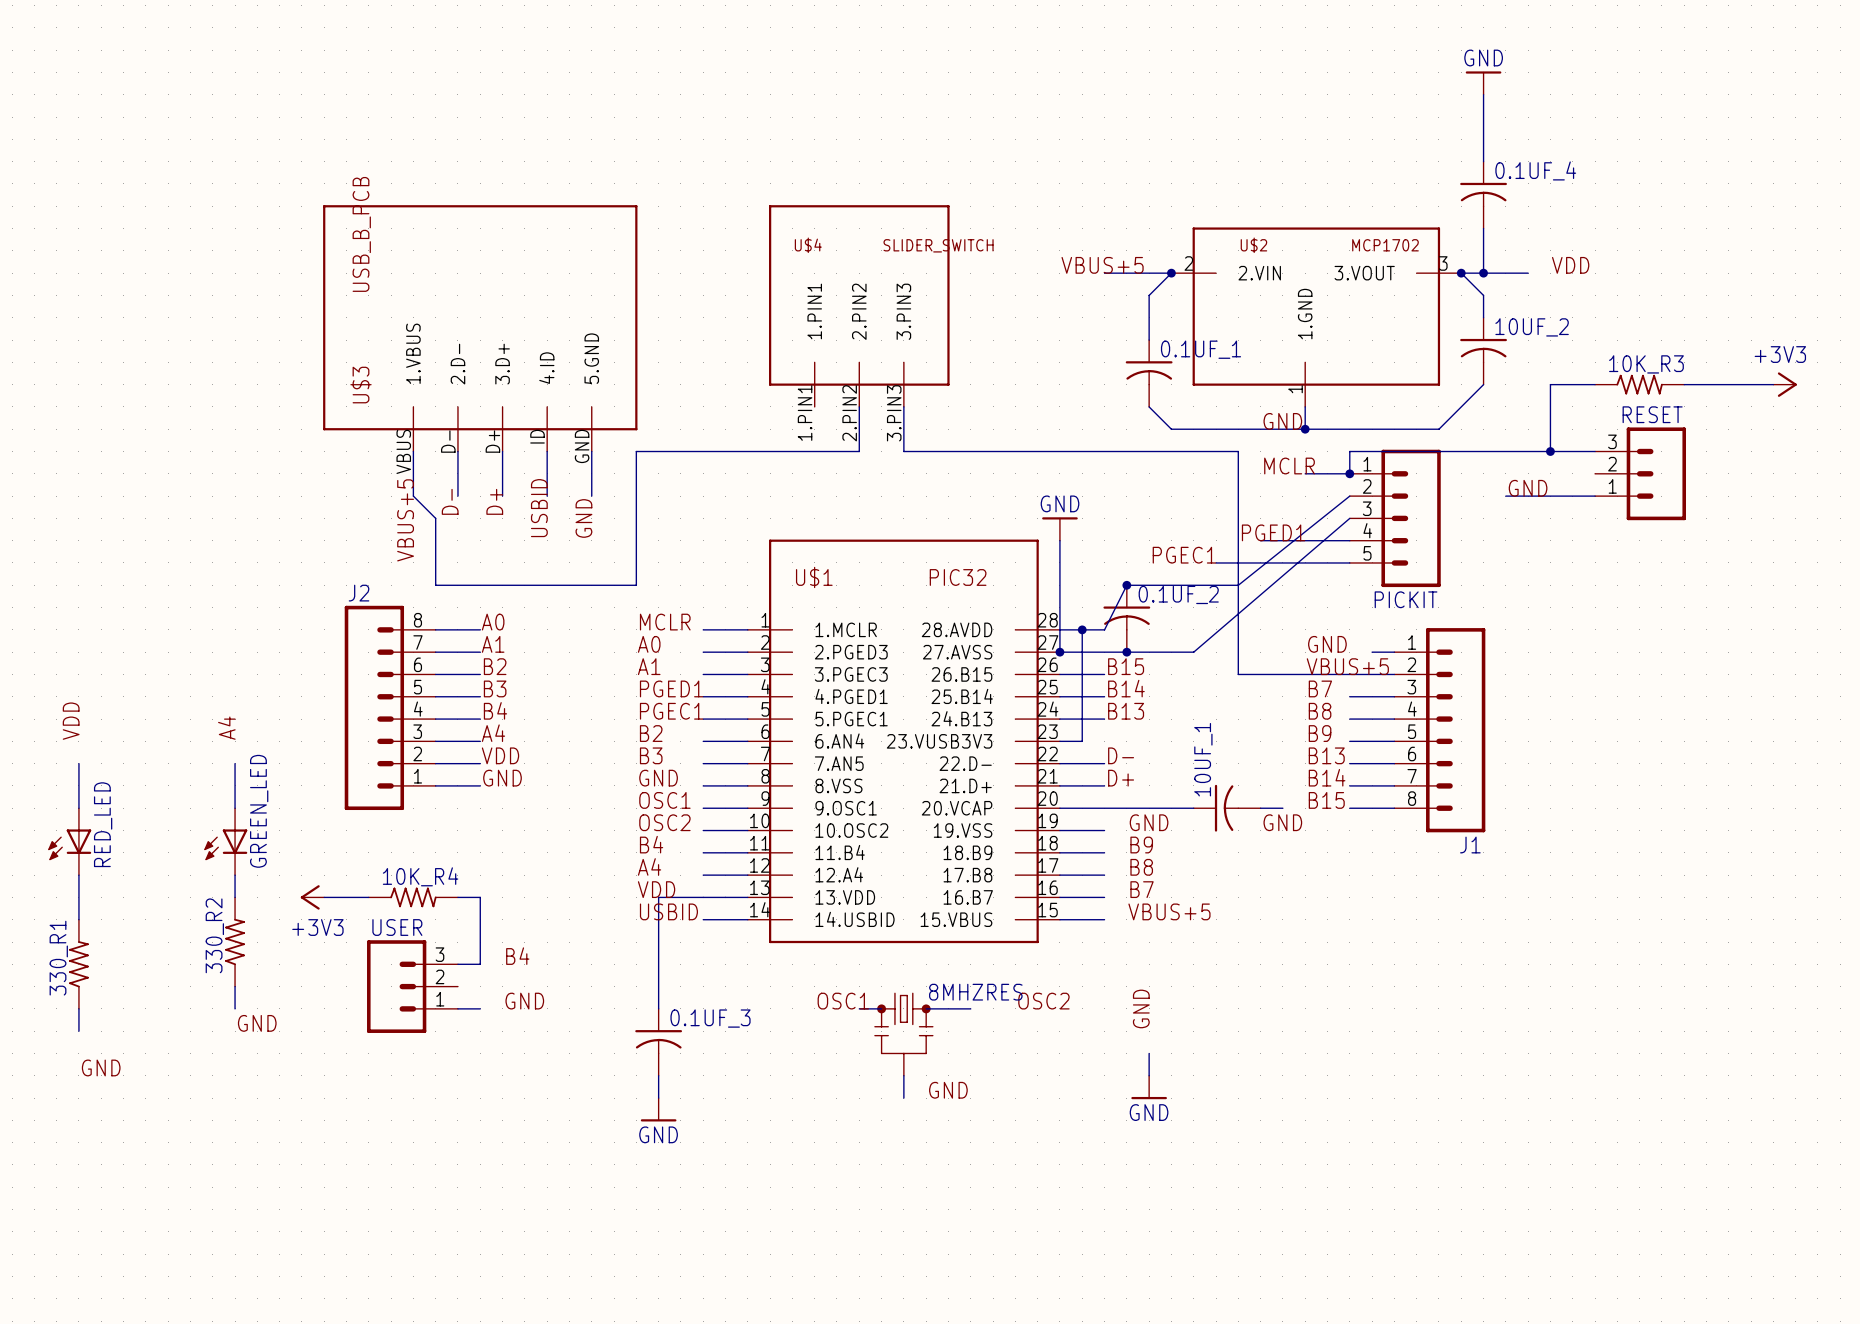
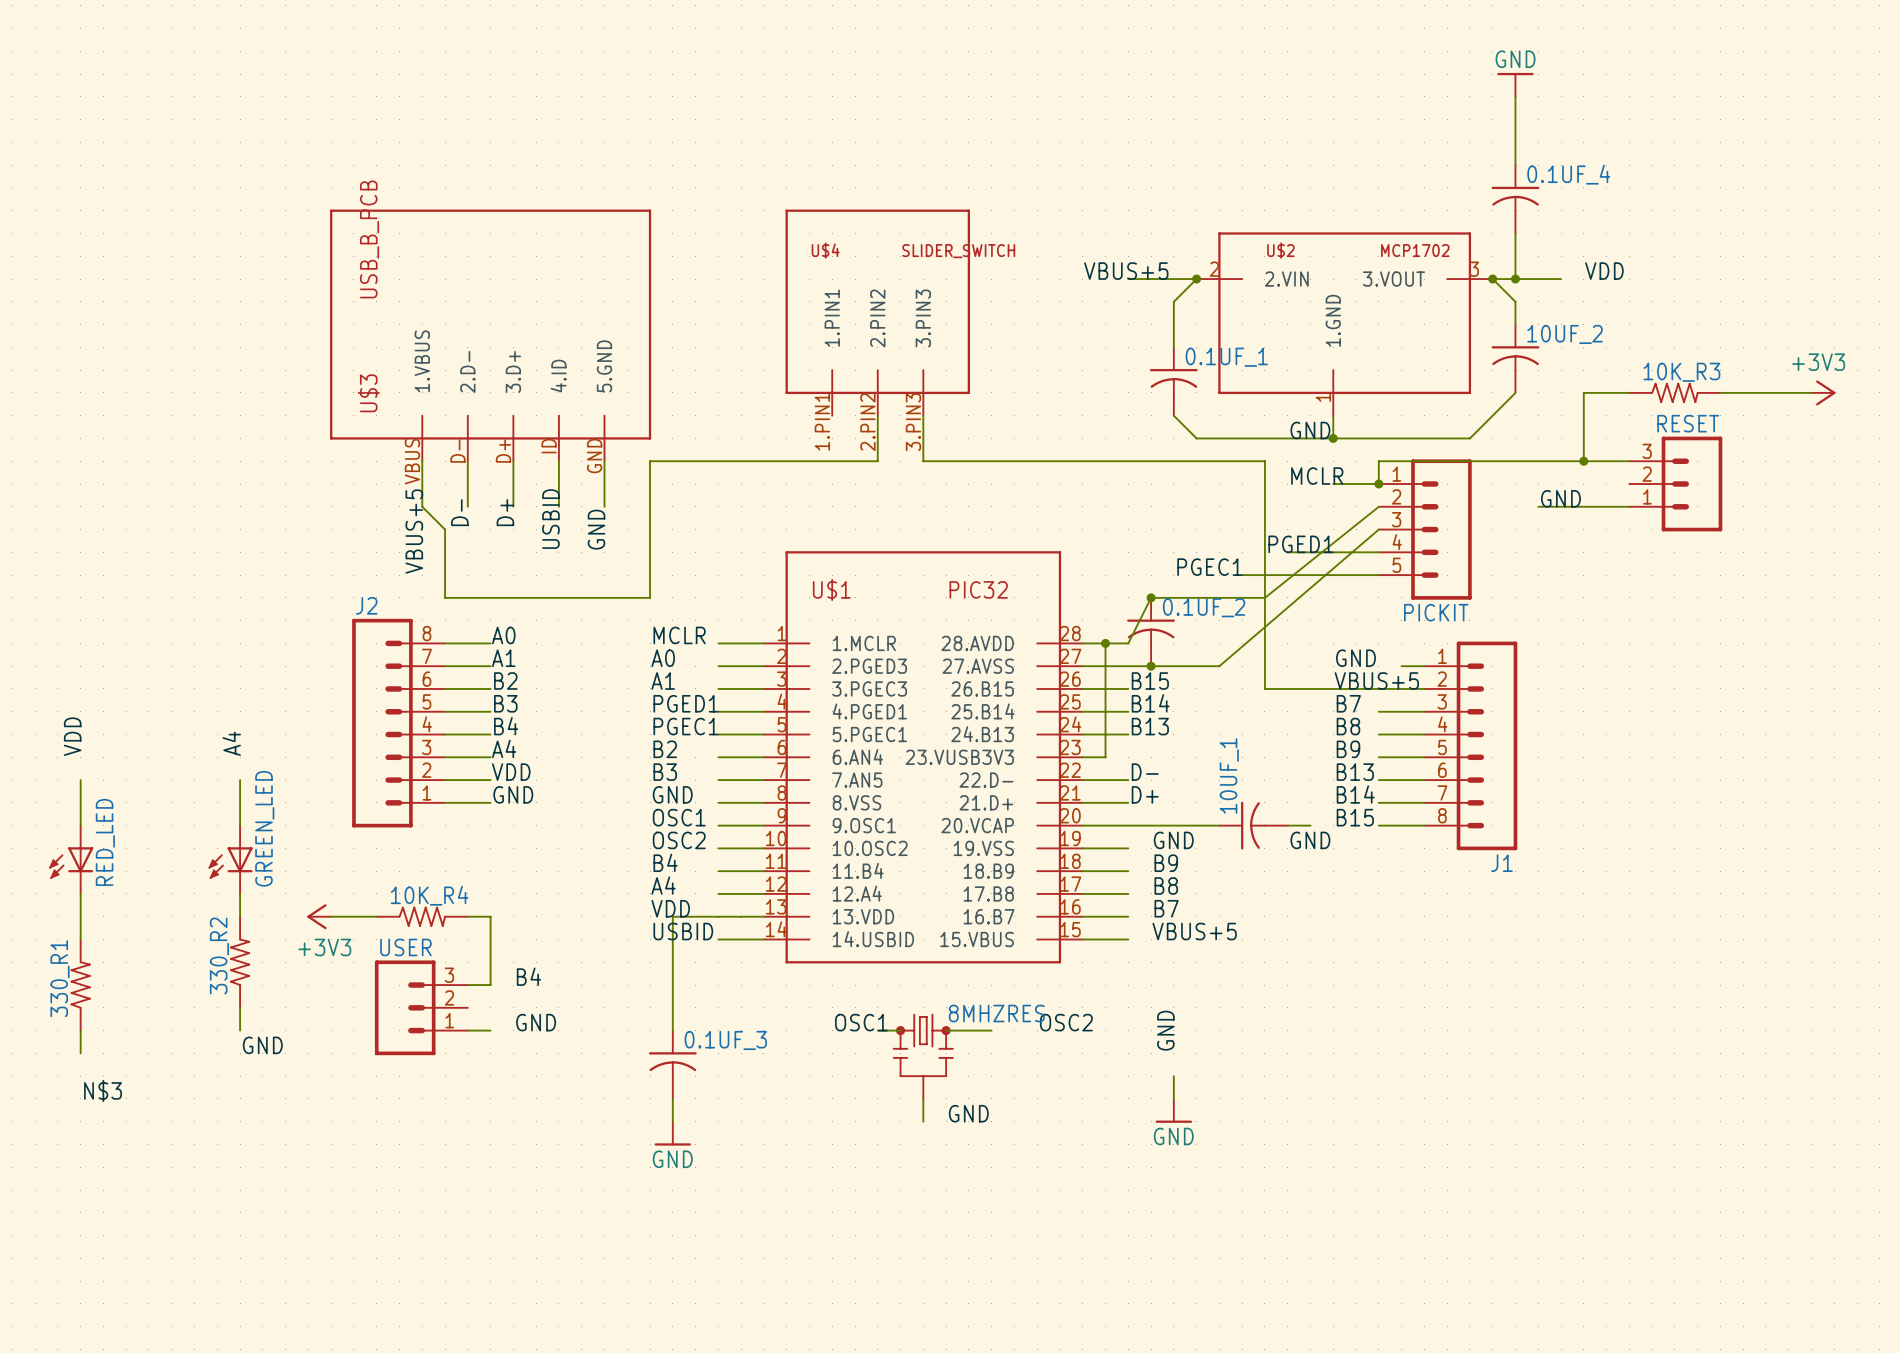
power symbol: GND (1059, 528) -> none
wire: (1059, 540) (1059, 652) -> none
junction: (1059, 652) -> none
label: GND (101, 1067) -> N$3 (103, 1090)

